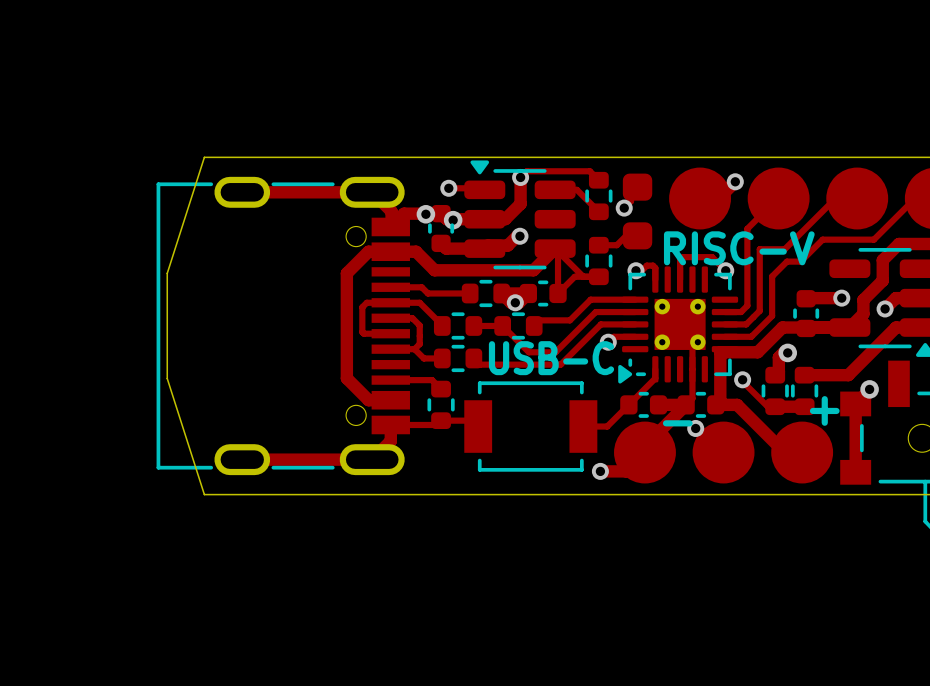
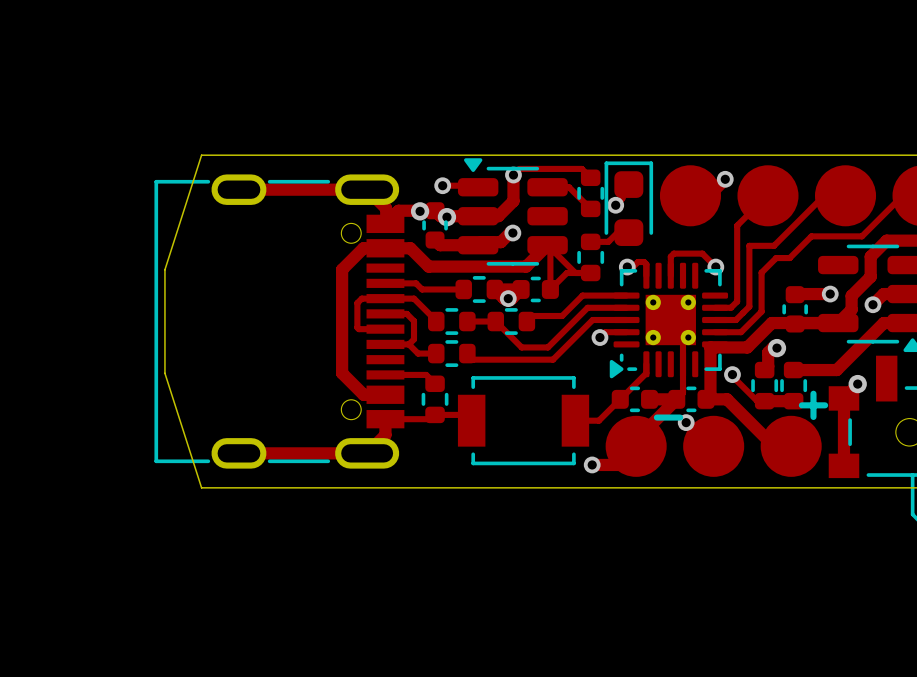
part footprint: [622, 173, 653, 250] -> [604, 161, 654, 246]
text: RISC-V (739, 248) -> none
text: USB-C (551, 358) -> none

